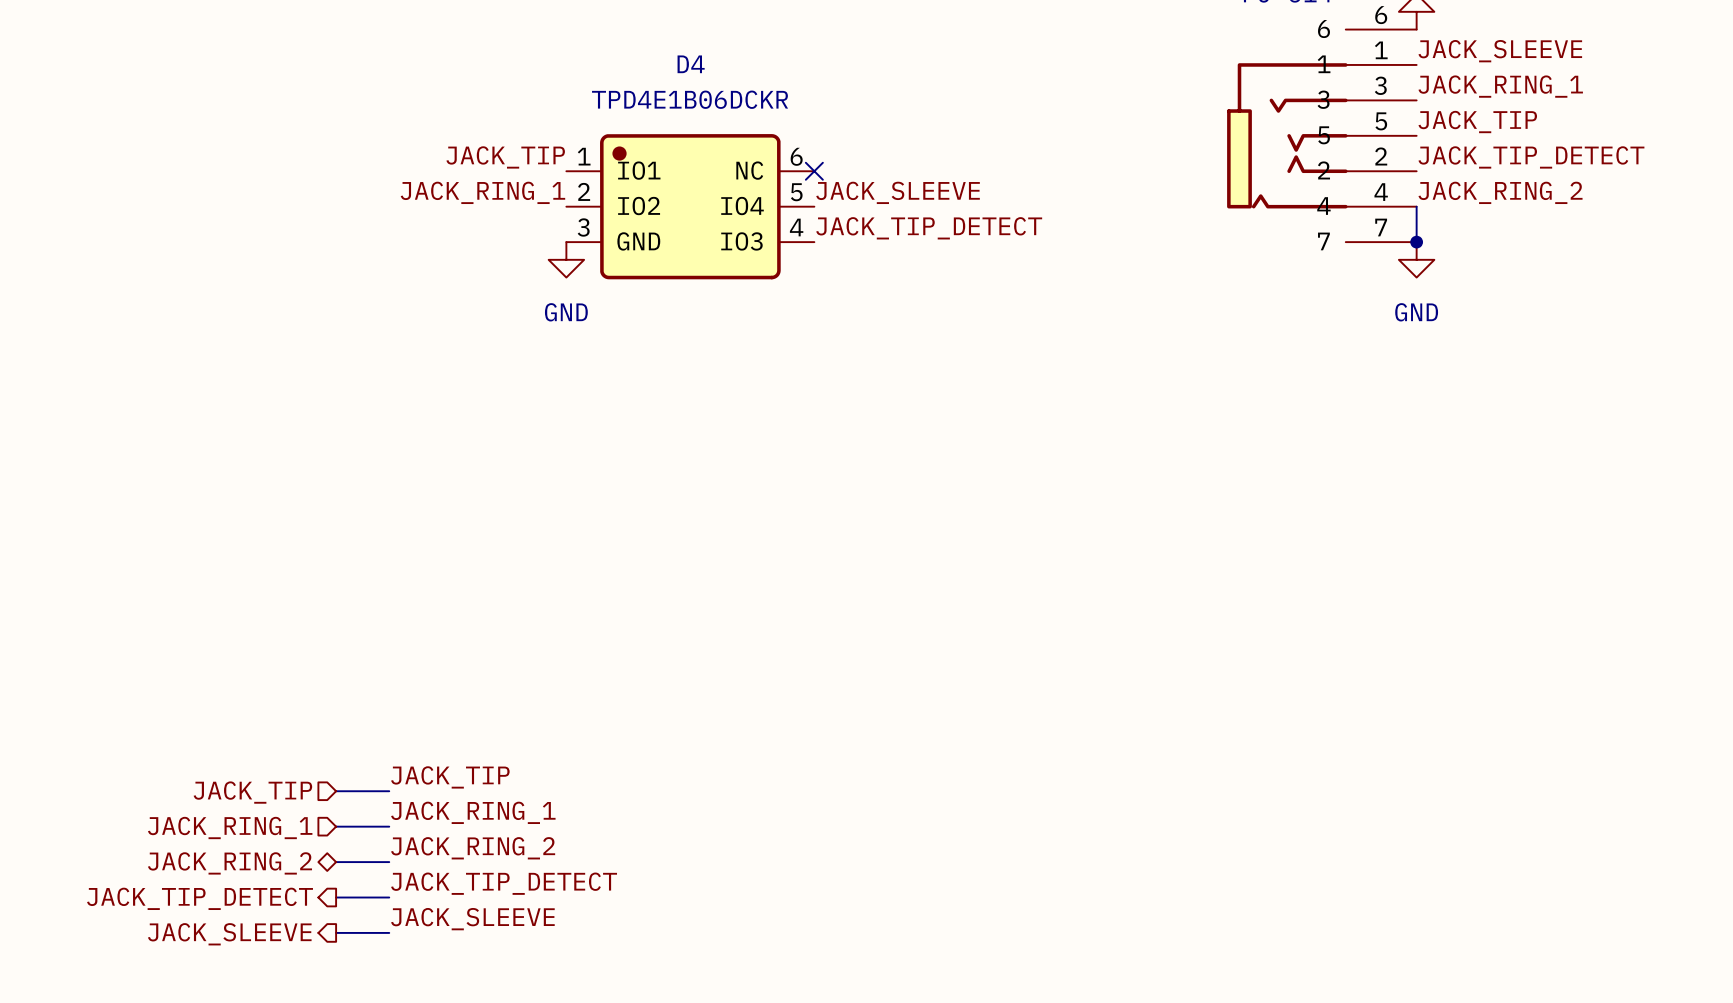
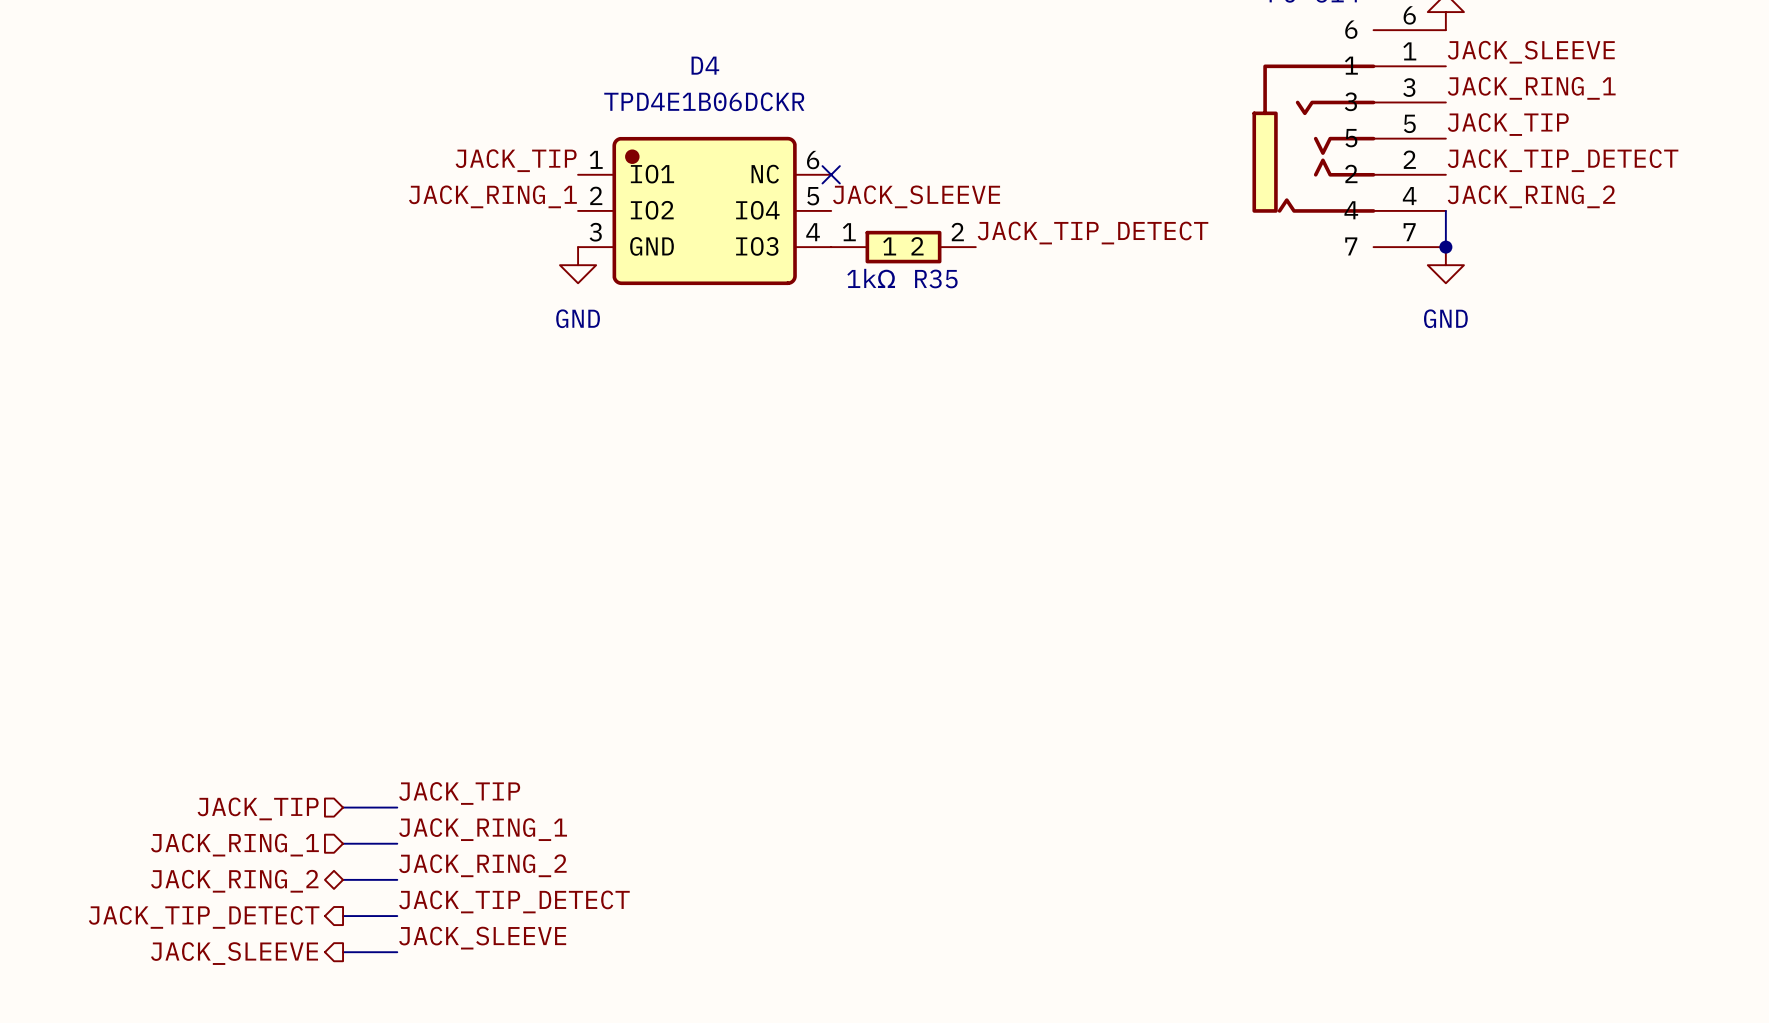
label position: JACK_TIP_DETECT (929, 228) -> JACK_TIP_DETECT (1093, 233)
R35: none -> 1kΩ (903, 247)

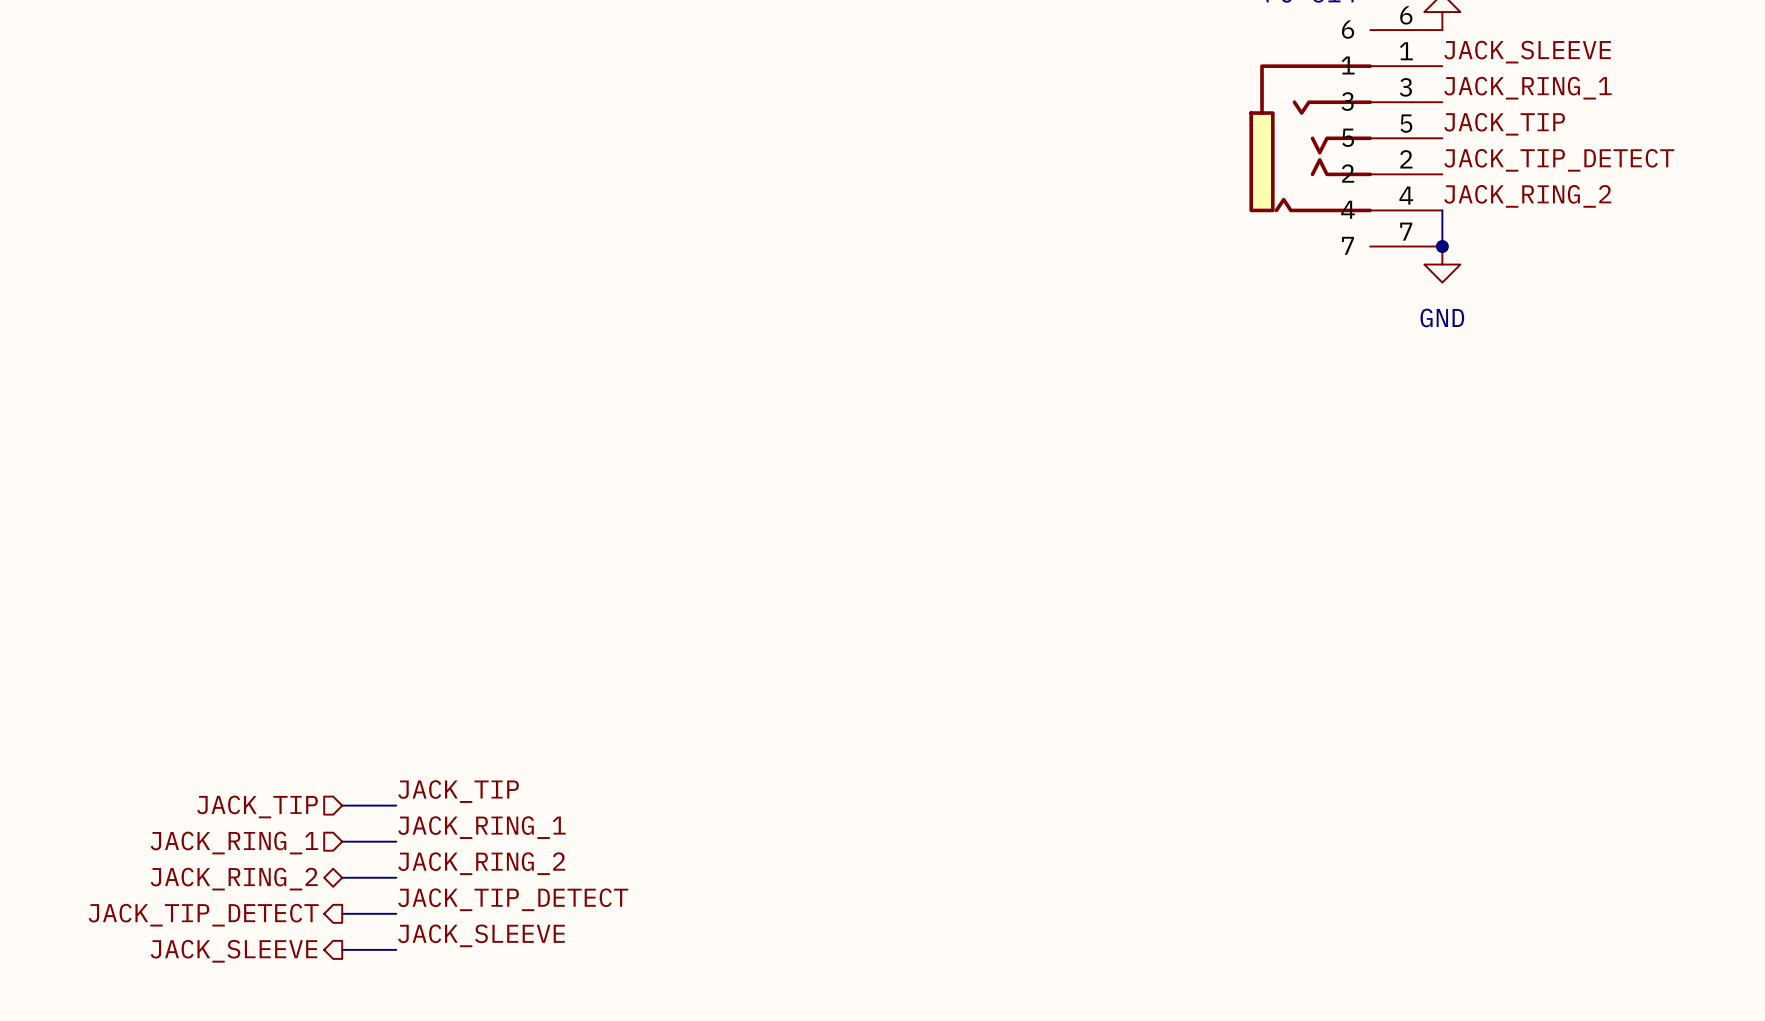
label: JACK_TIP (516, 160) -> none
no-connect mark: (831, 174) -> none
label: JACK_RING_1 (492, 196) -> none
label: JACK_SLEEVE (916, 196) -> none
D4: TPD4E1B06DCKR (704, 210) -> none
label: JACK_TIP_DETECT (1093, 233) -> none
R35: 1kΩ (903, 247) -> none
power symbol: GND (578, 265) -> none

